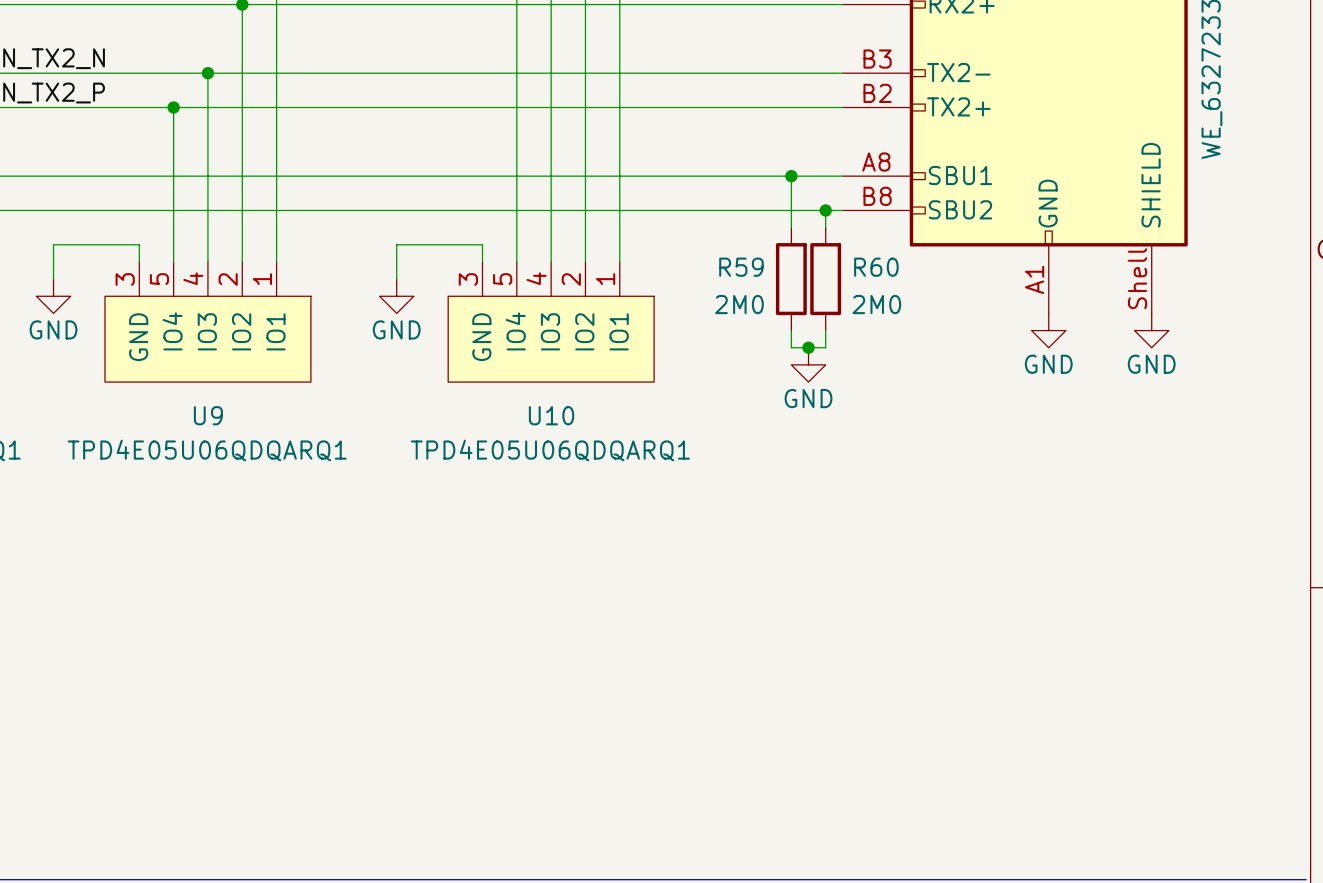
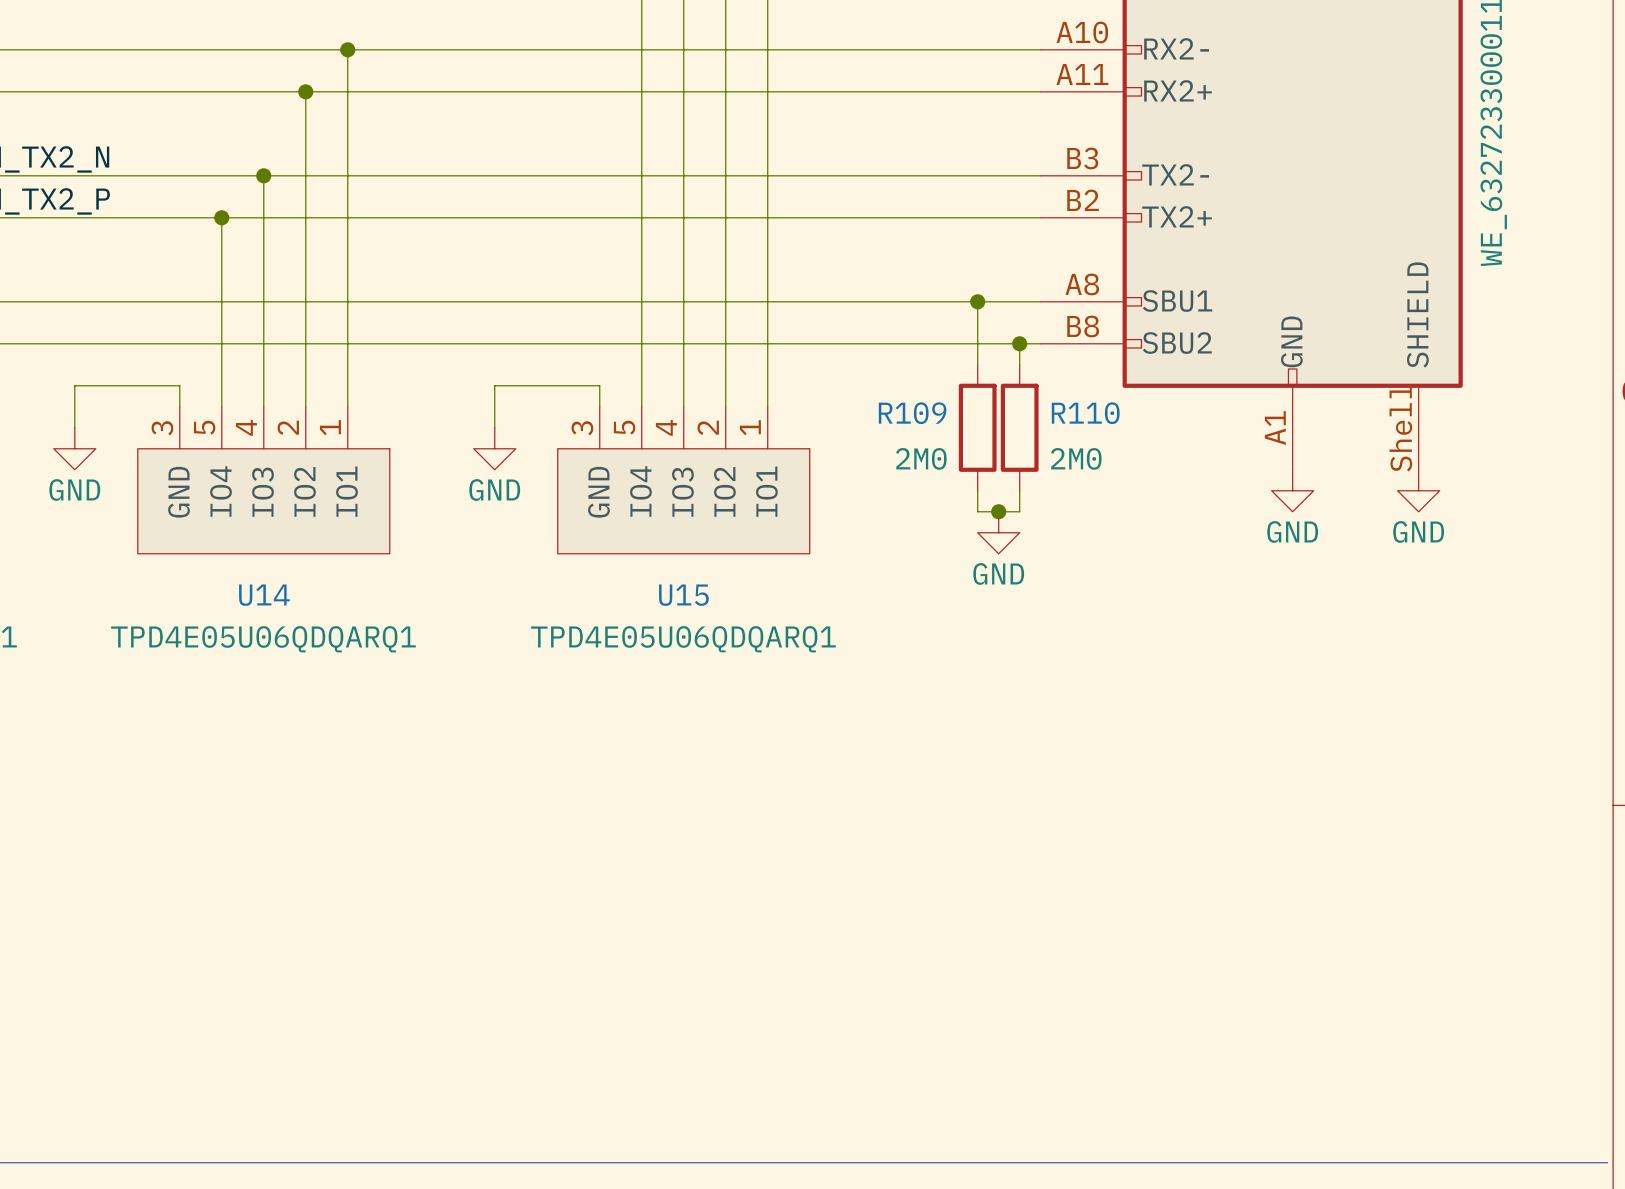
R59 name: R59 (741, 267) -> R109 (912, 413)
R60 name: R60 (876, 267) -> R110 (1085, 413)
U9 name: U9 (208, 415) -> U14 (264, 595)
U10 name: U10 (551, 415) -> U15 (683, 595)

